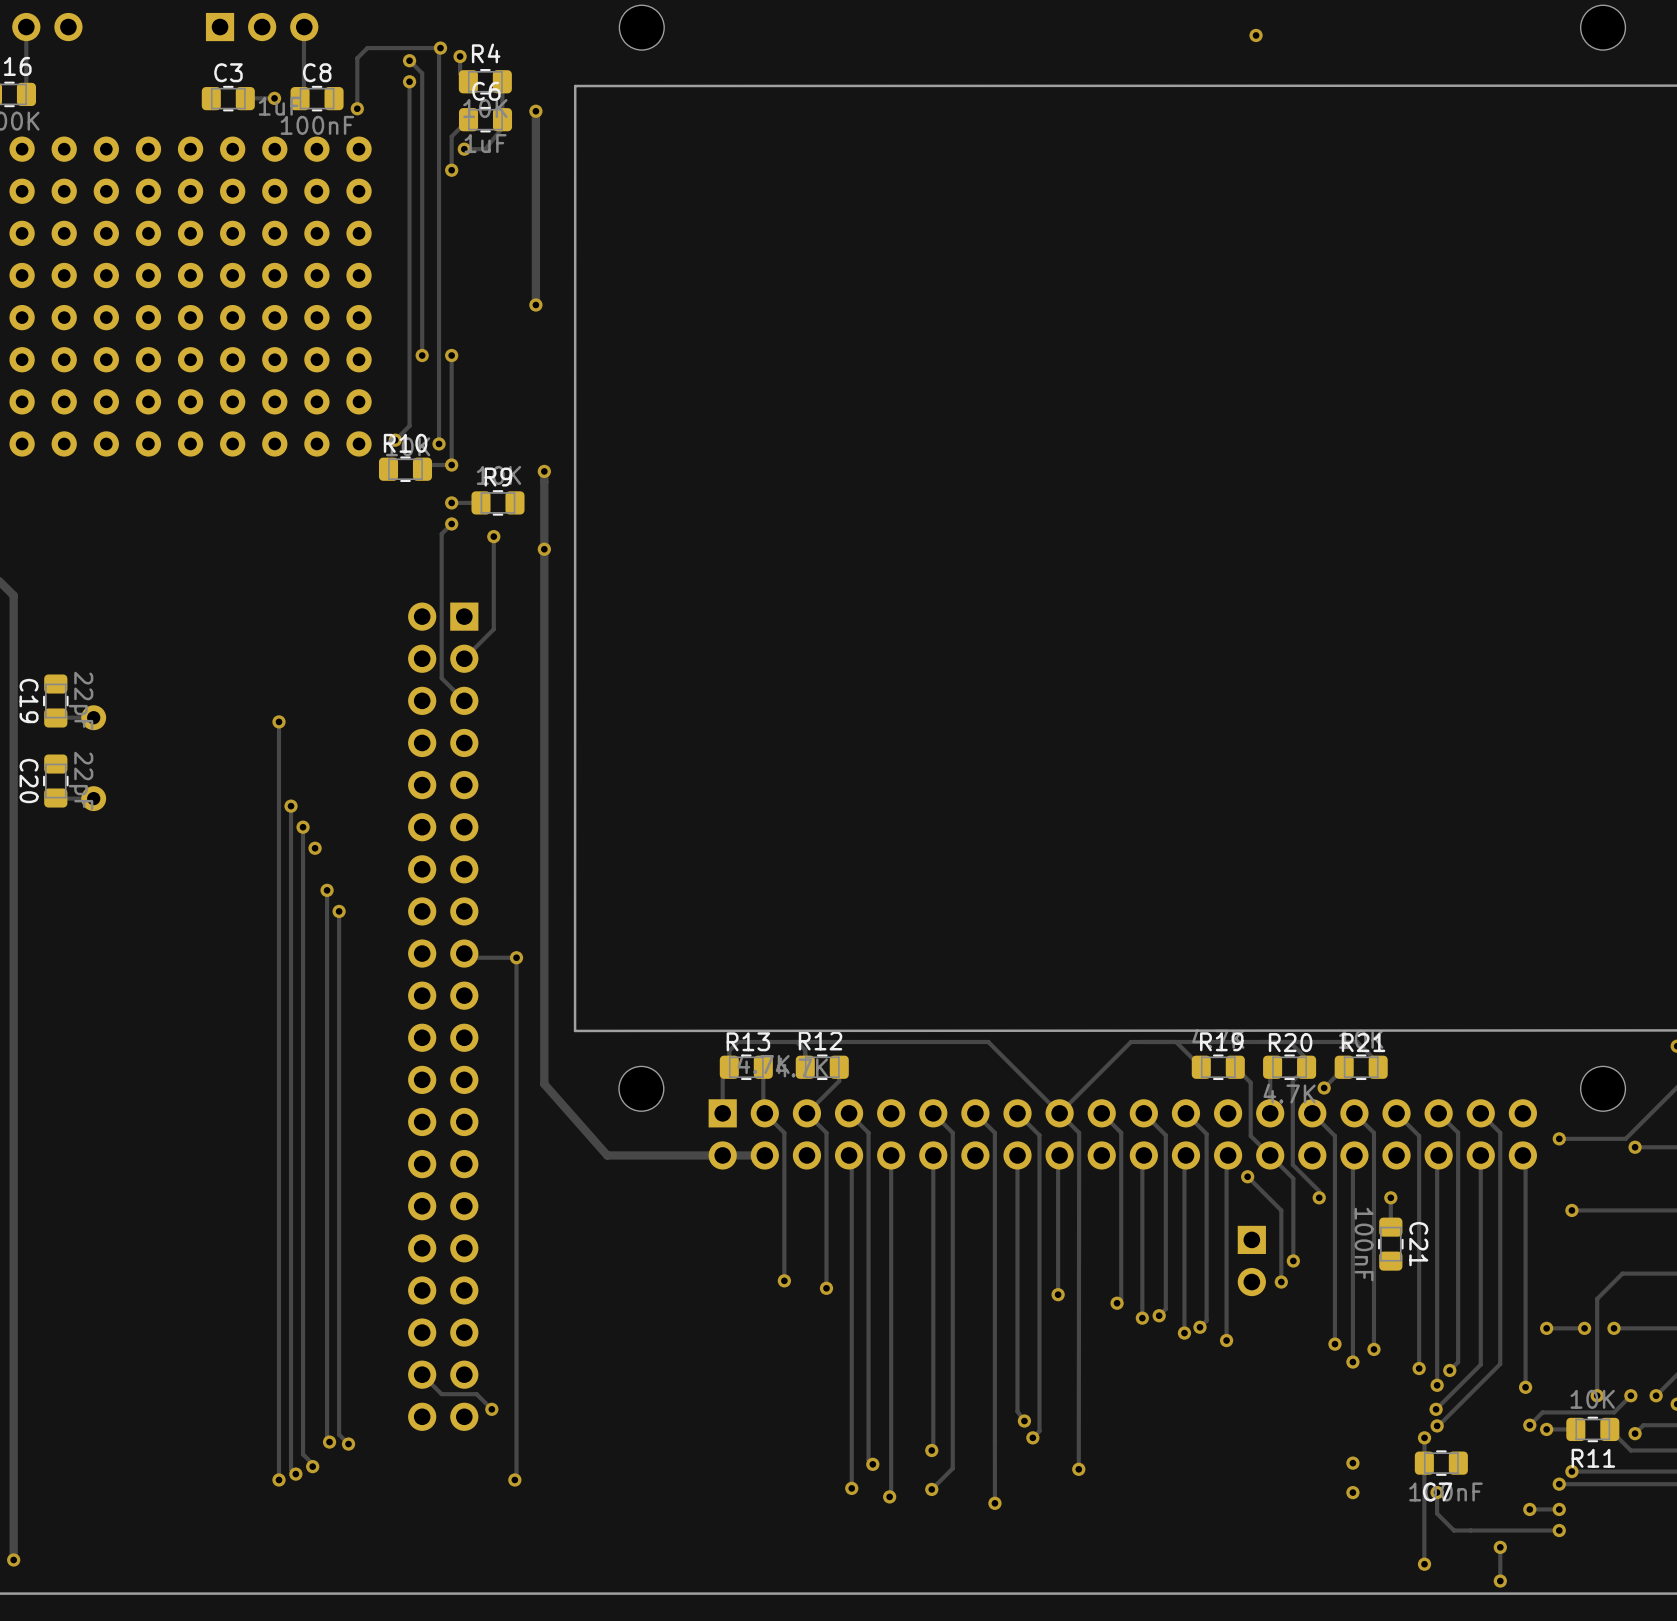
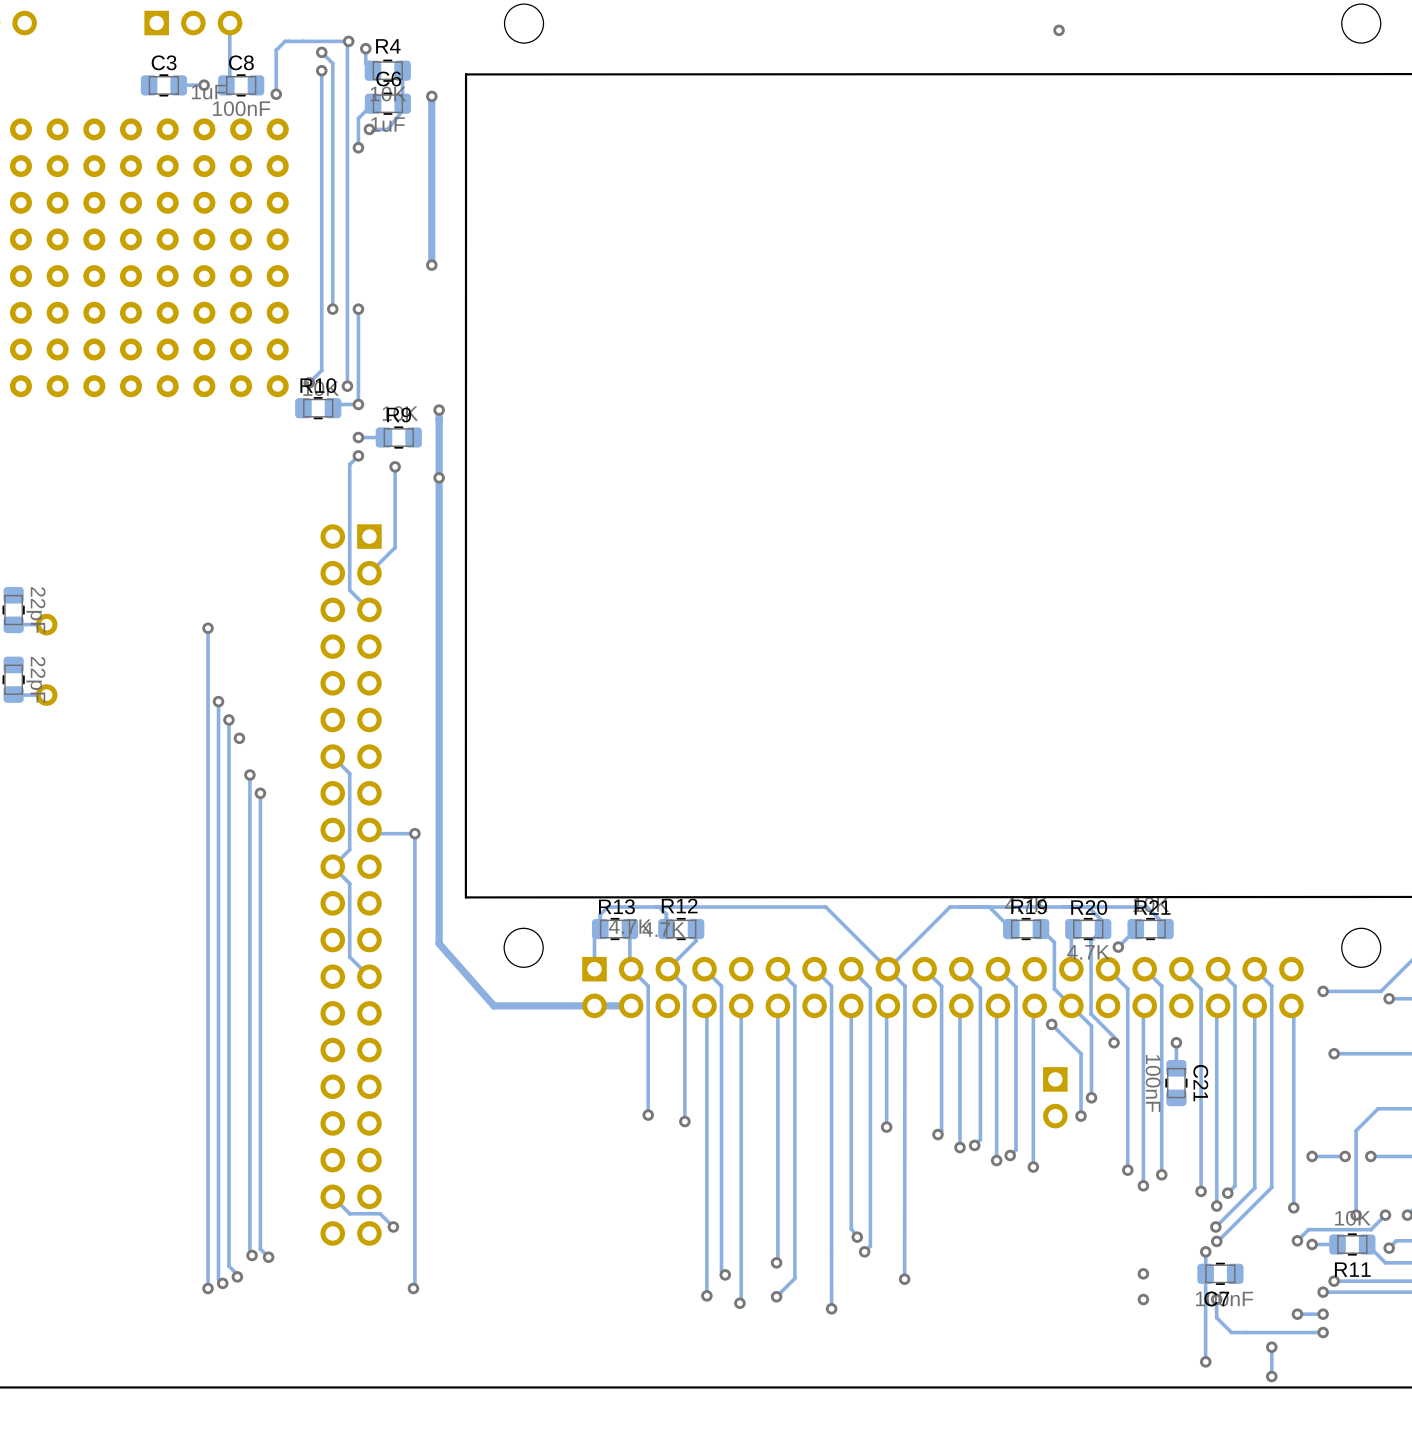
track: none -> (332, 756) (349, 773) (349, 849) (332, 866) (349, 883) (349, 956) (369, 976)

